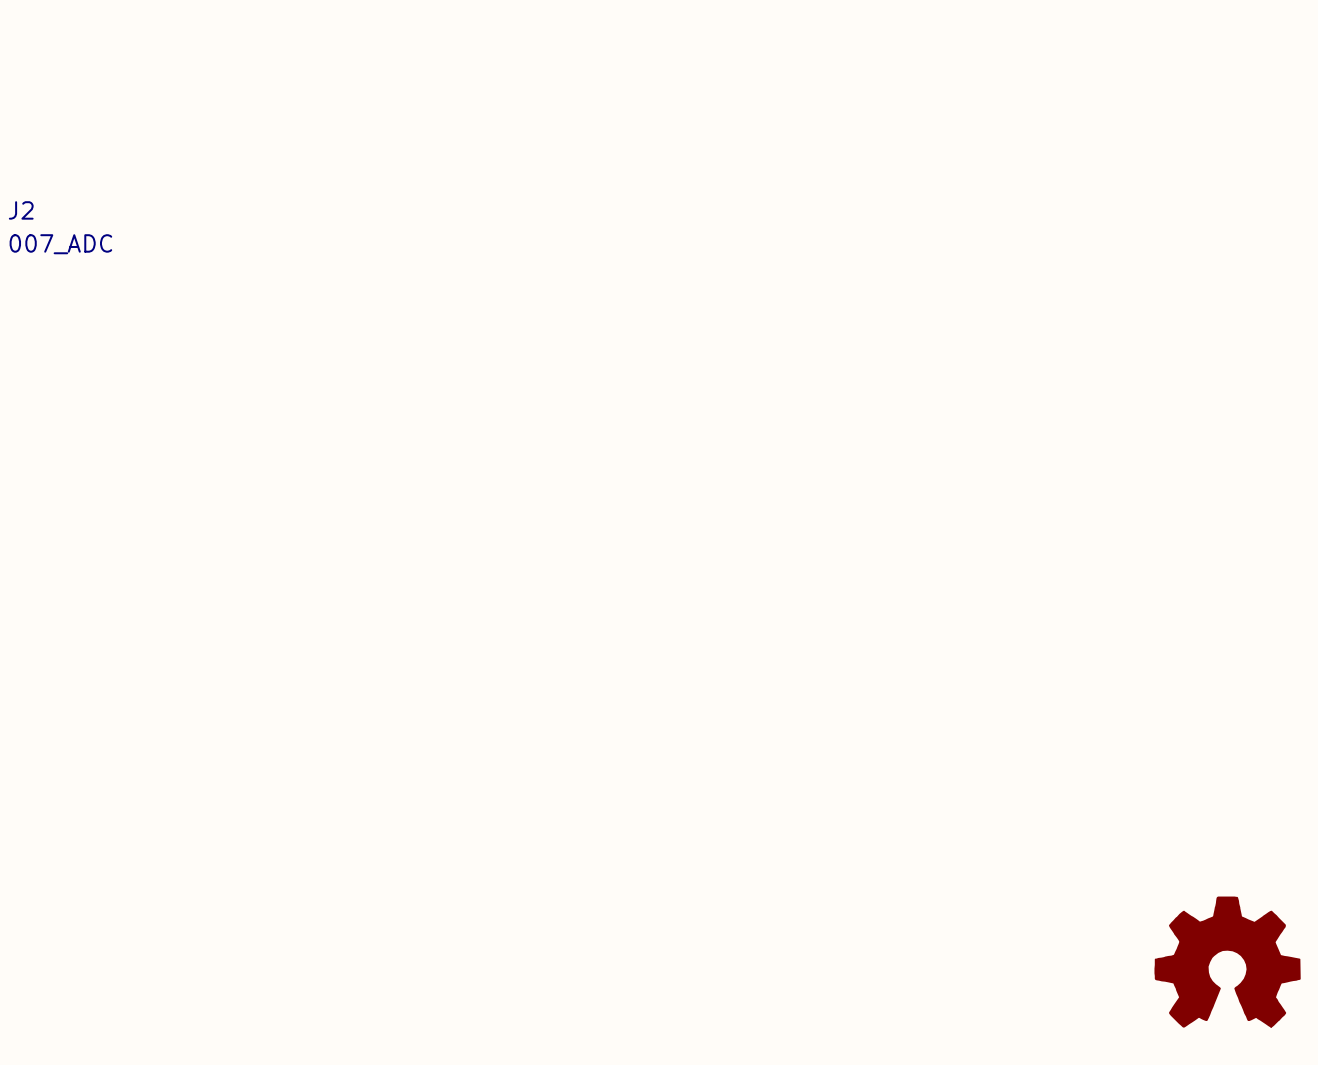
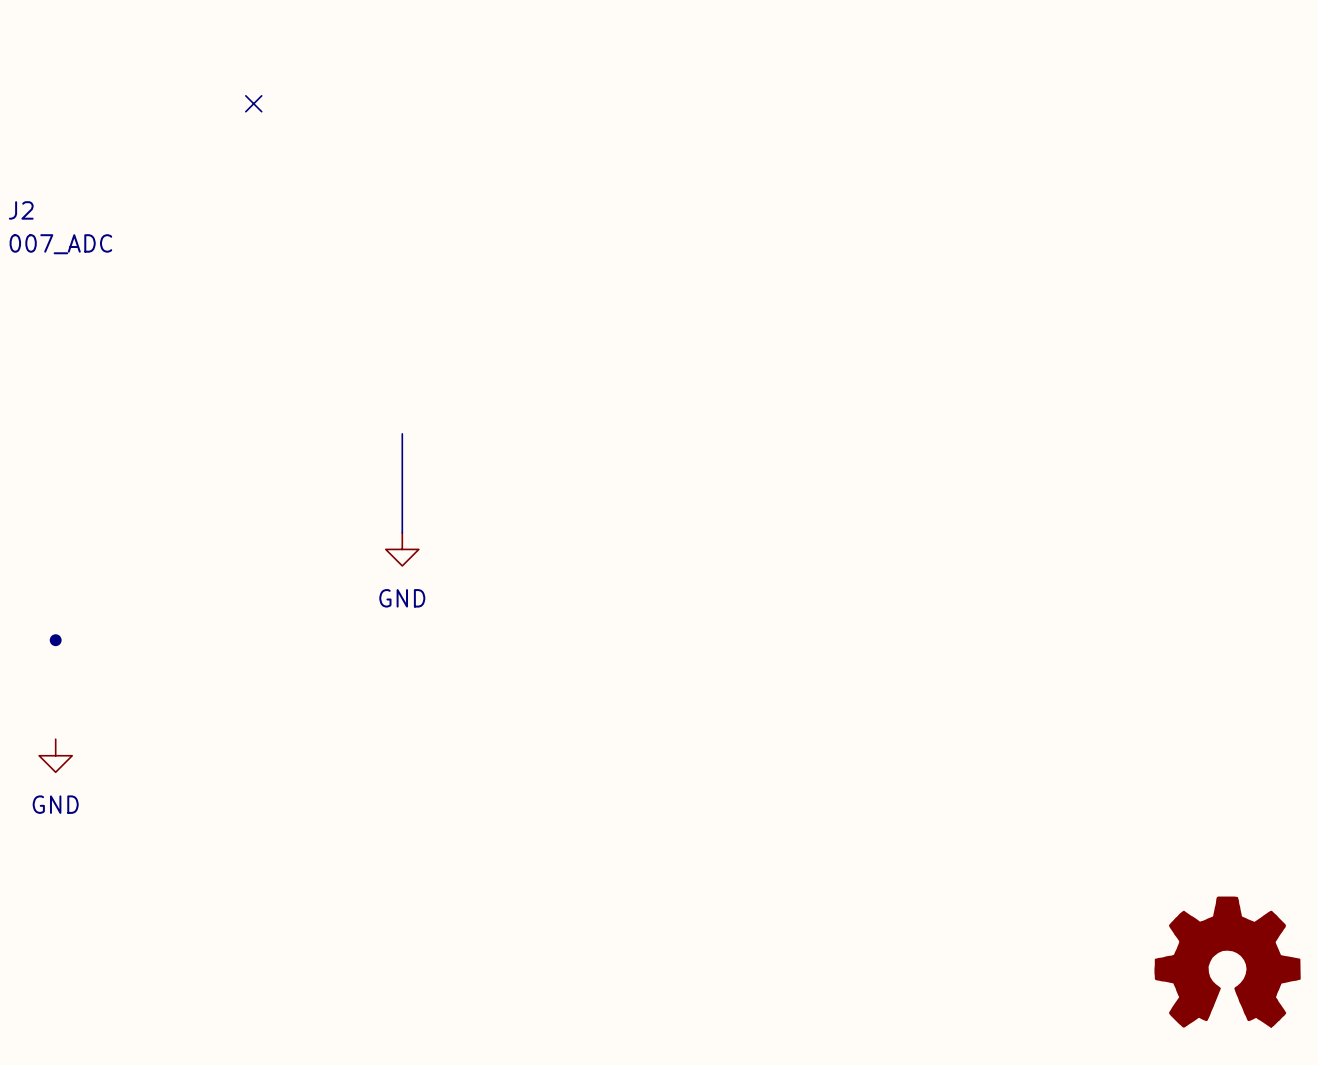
no-connect mark: none -> (253, 103)
wire: none -> (402, 433) (402, 532)
power symbol: none -> GND (402, 549)
junction: none -> (55, 640)
power symbol: none -> GND (55, 755)

